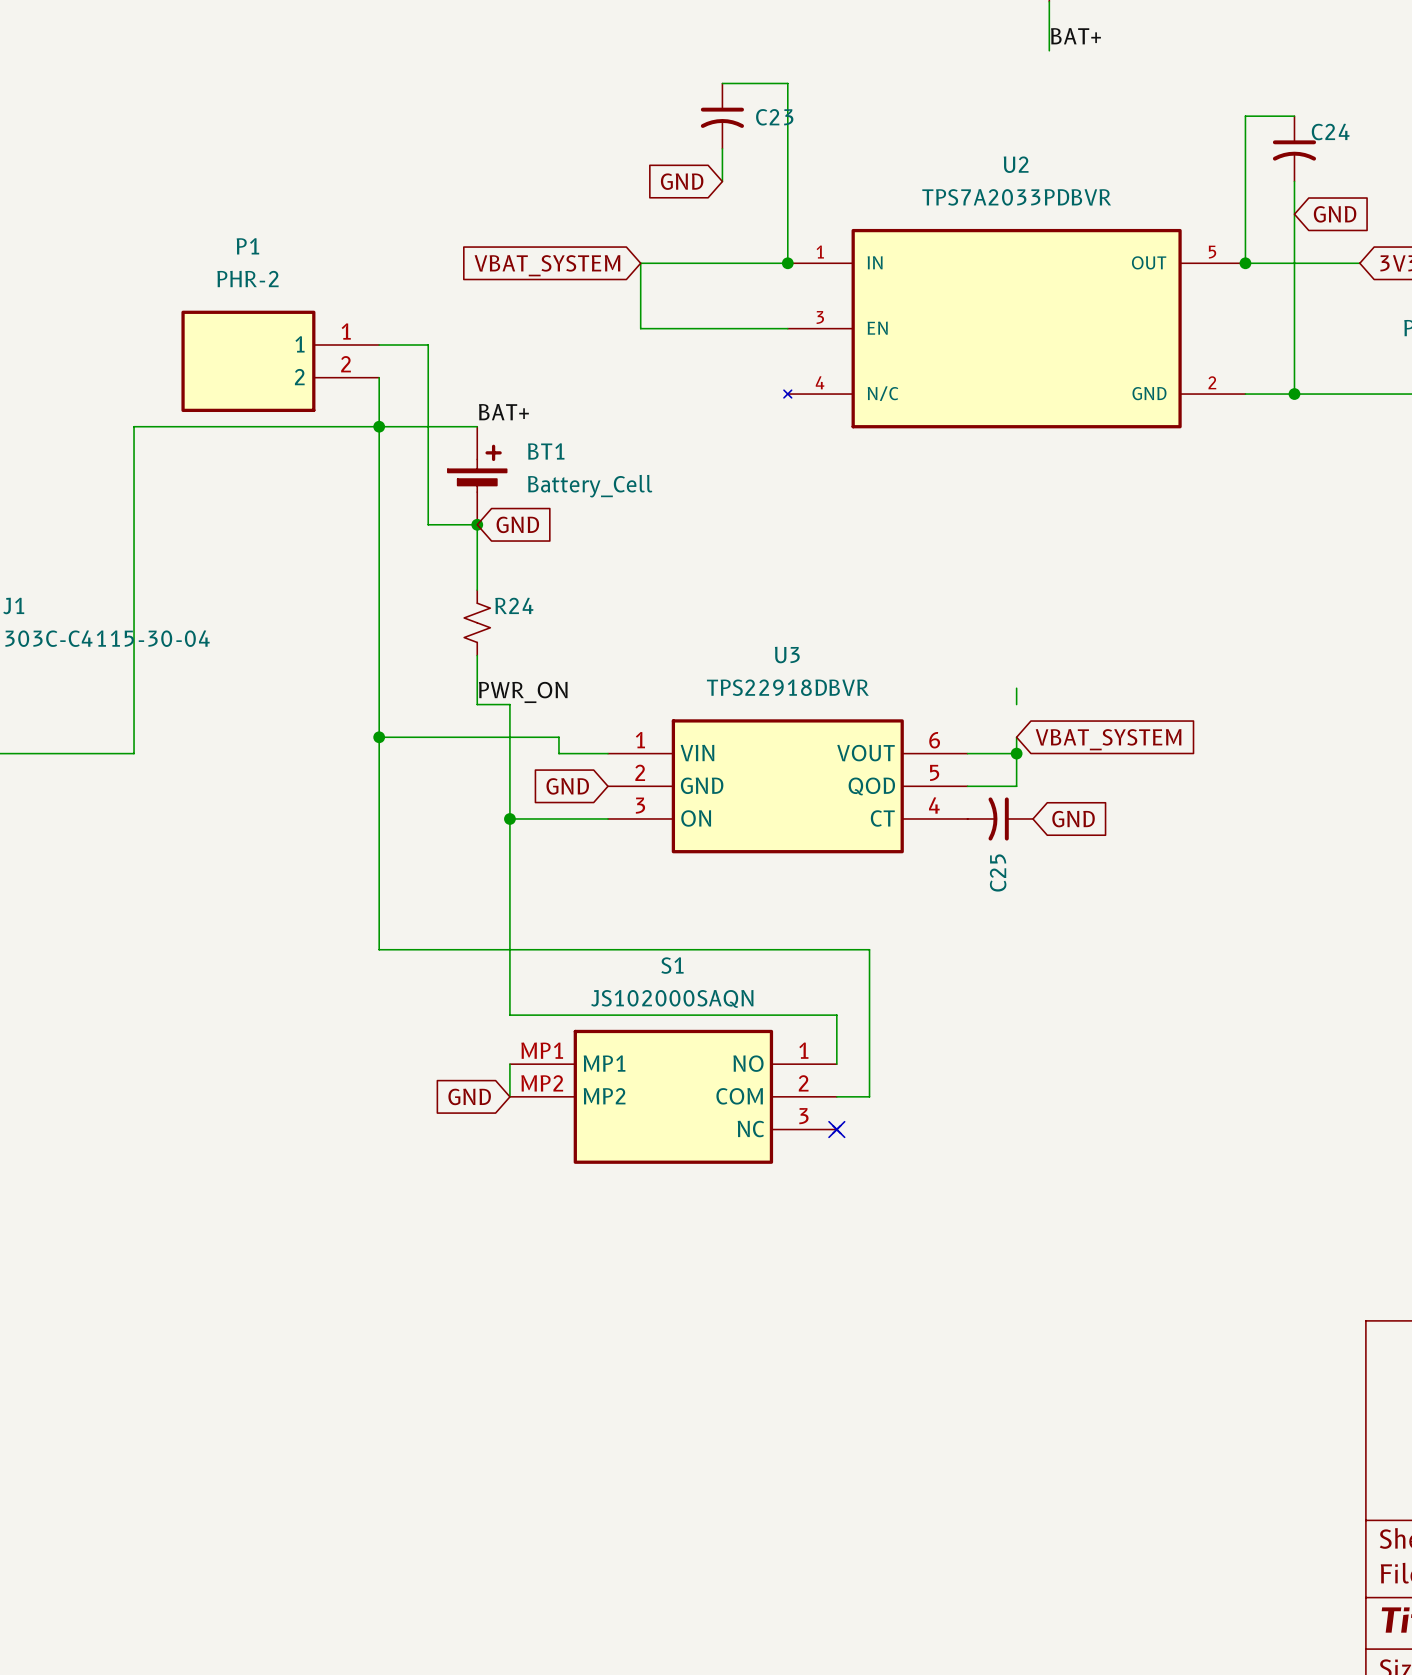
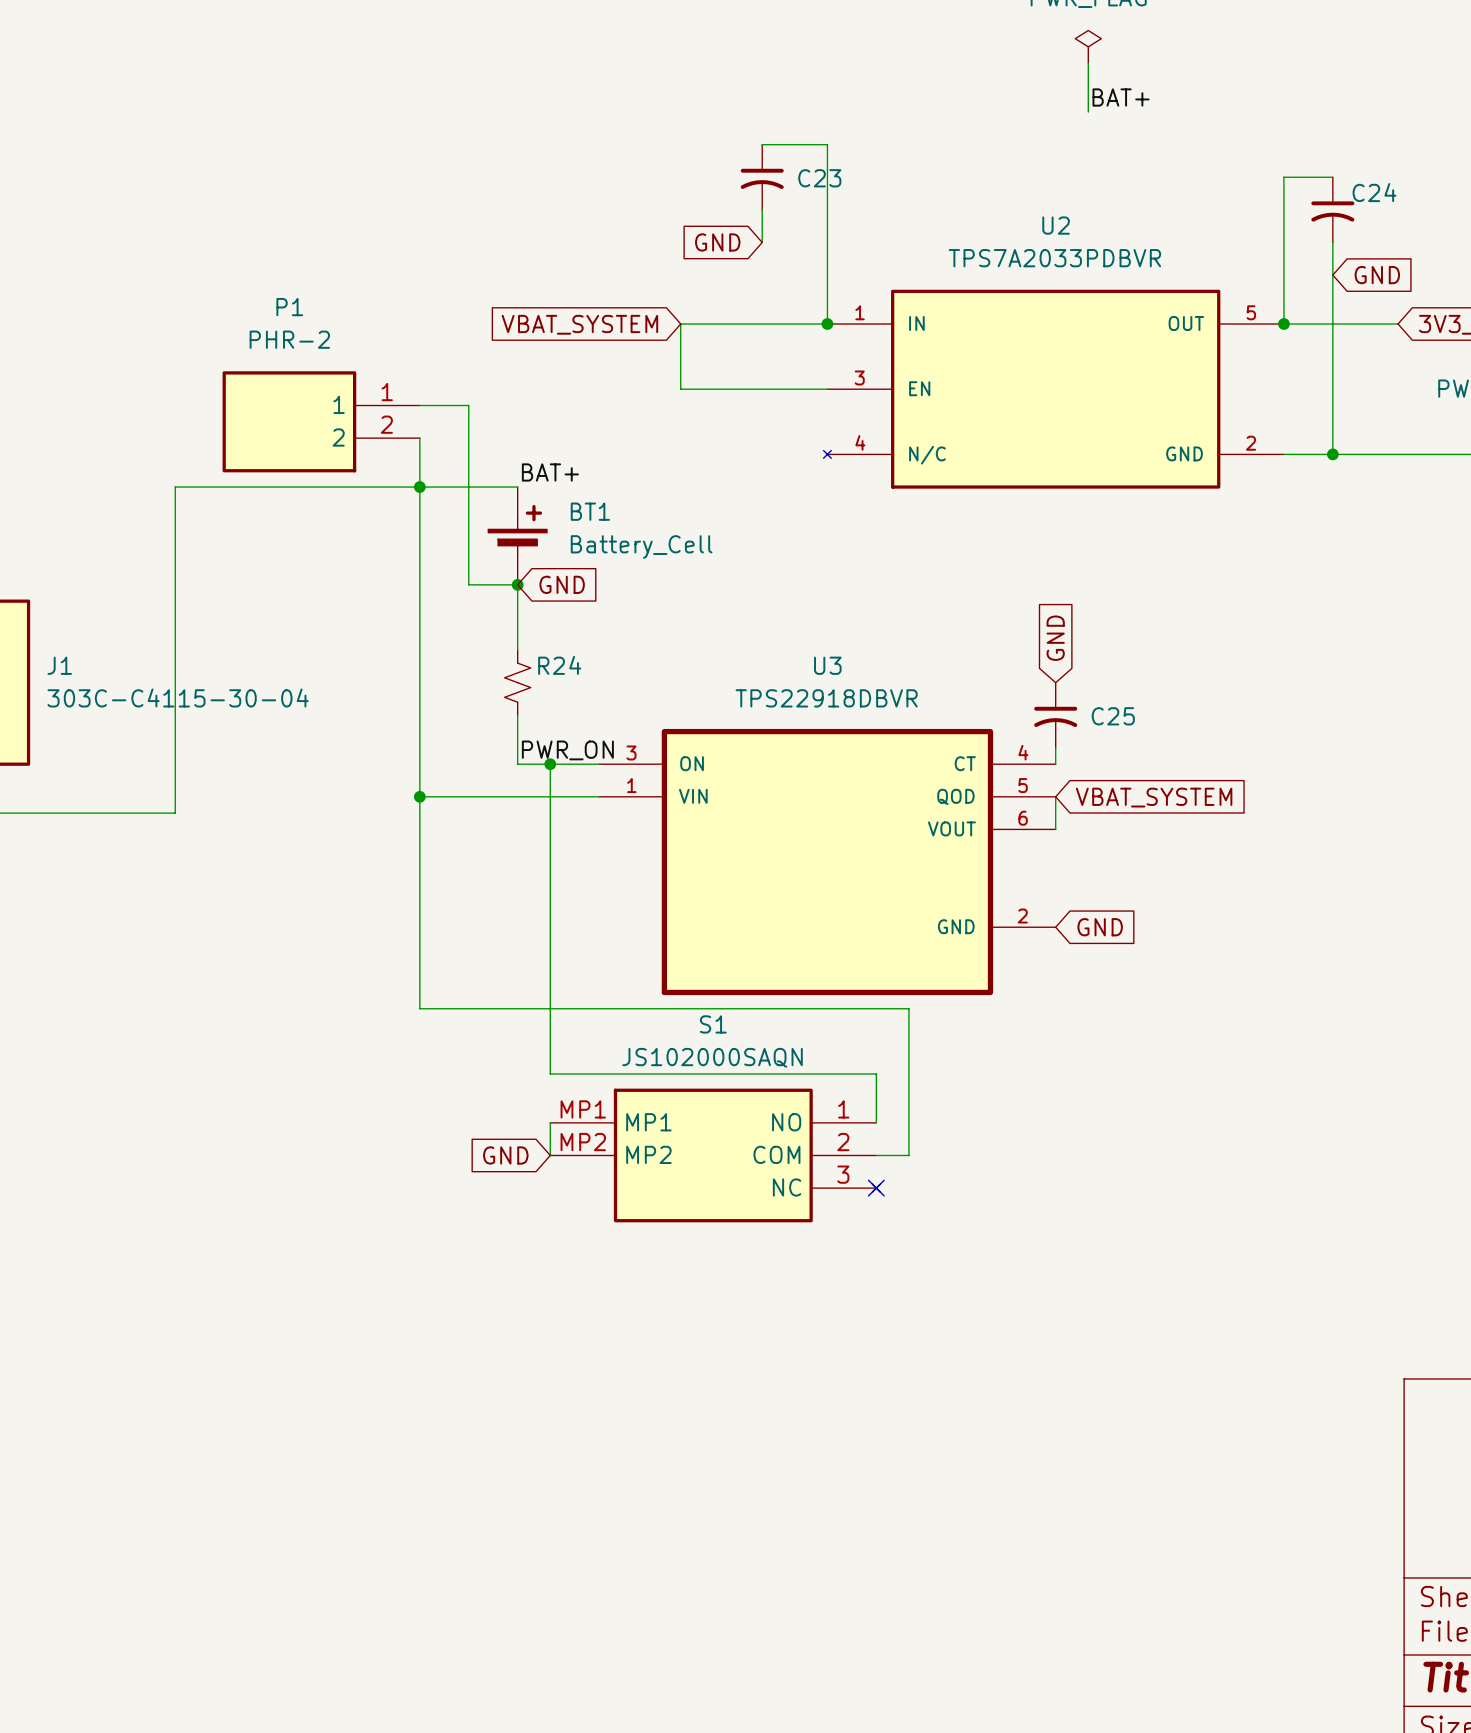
global label: none -> GND (1055, 638)
U3 name position: U3 (787, 655) -> U3 (827, 665)
U3 value position: TPS22918DBVR (787, 687) -> TPS22918DBVR (826, 698)
wire: none -> (550, 764) (599, 764)
junction: none -> (550, 764)
U3 symbol: [608, 719, 968, 854] -> [599, 728, 1056, 996]
wire: (558, 737) (558, 753) (608, 753) -> none
wire: (967, 753) (1016, 753) -> none
junction: (1016, 753) -> none
wire: (1016, 769) (1016, 786) (967, 786) -> none
global label: GND (567, 786) -> none
wire: (509, 818) (608, 818) -> none
junction: (509, 818) -> none
C25 rotation: 0° (998, 818) -> 90° counterclockwise (1055, 716)
C25 position: (1000, 818) -> (1055, 715)
global label position: GND (1073, 819) -> GND (1100, 927)

